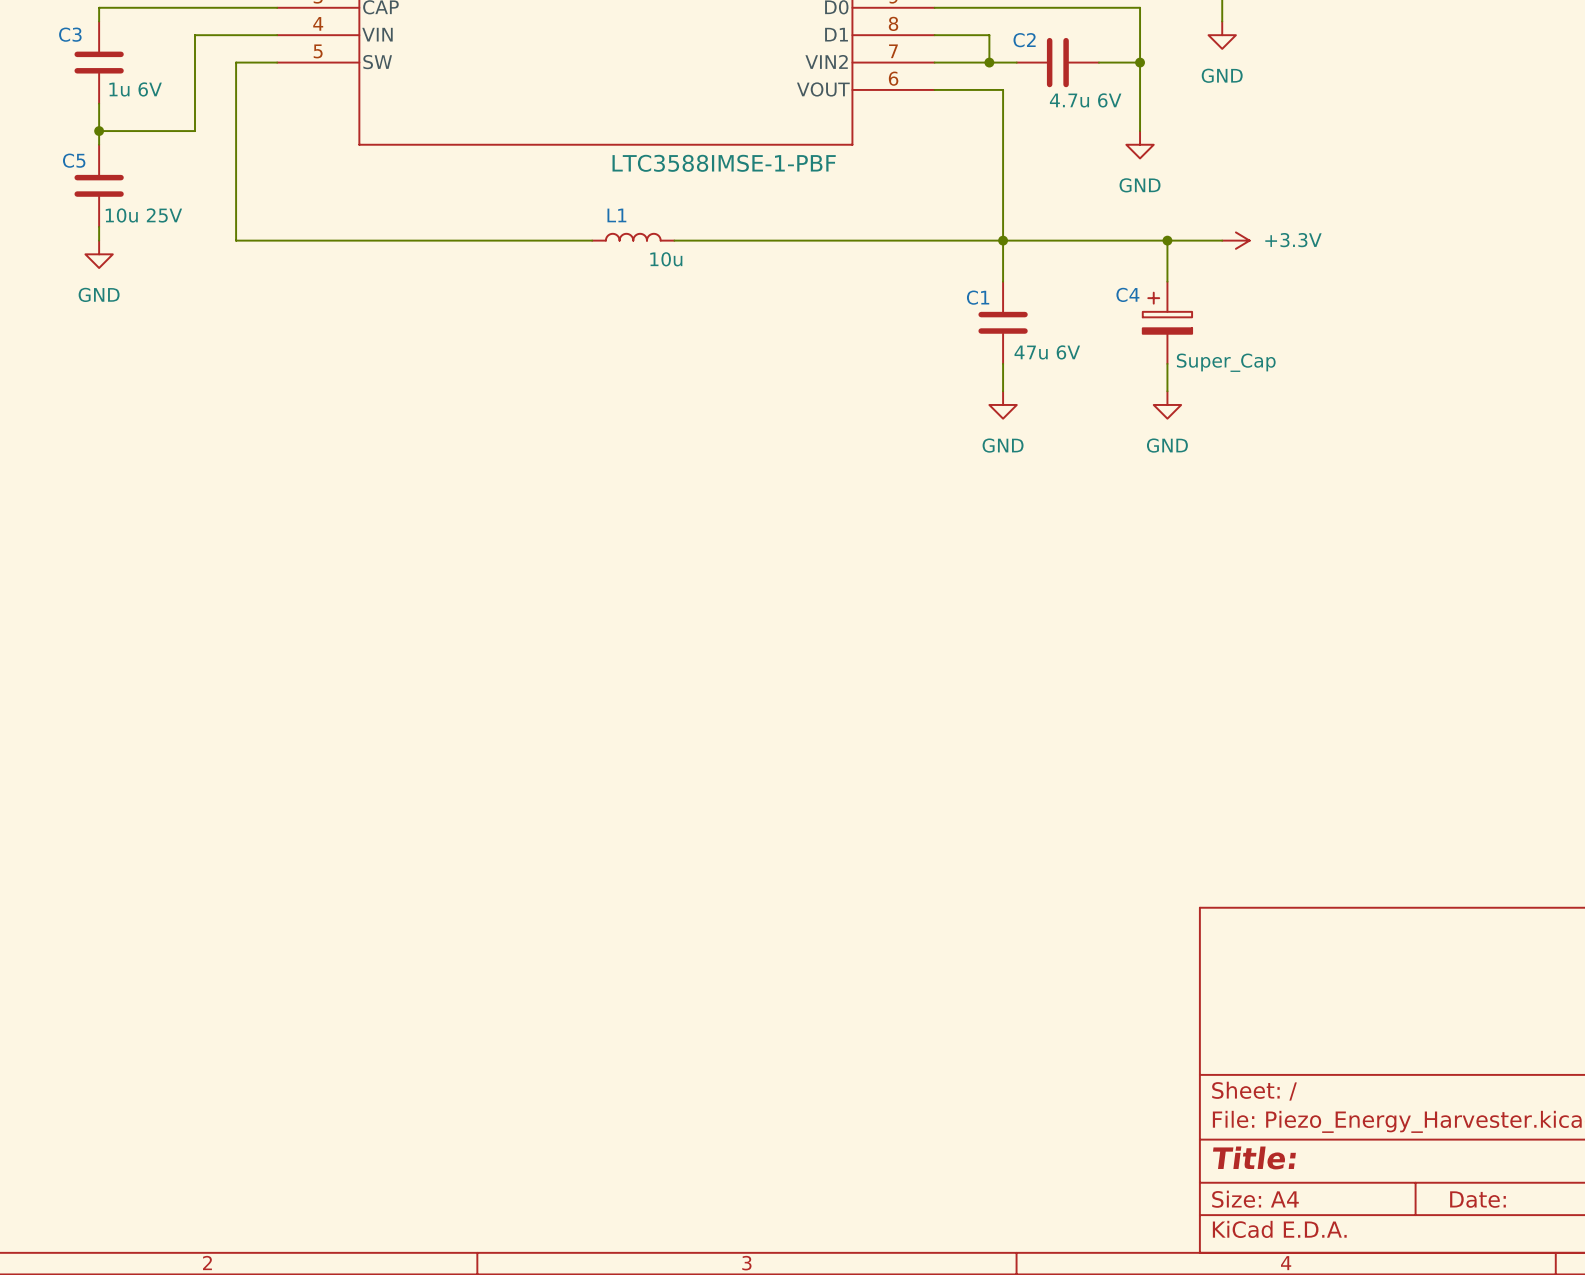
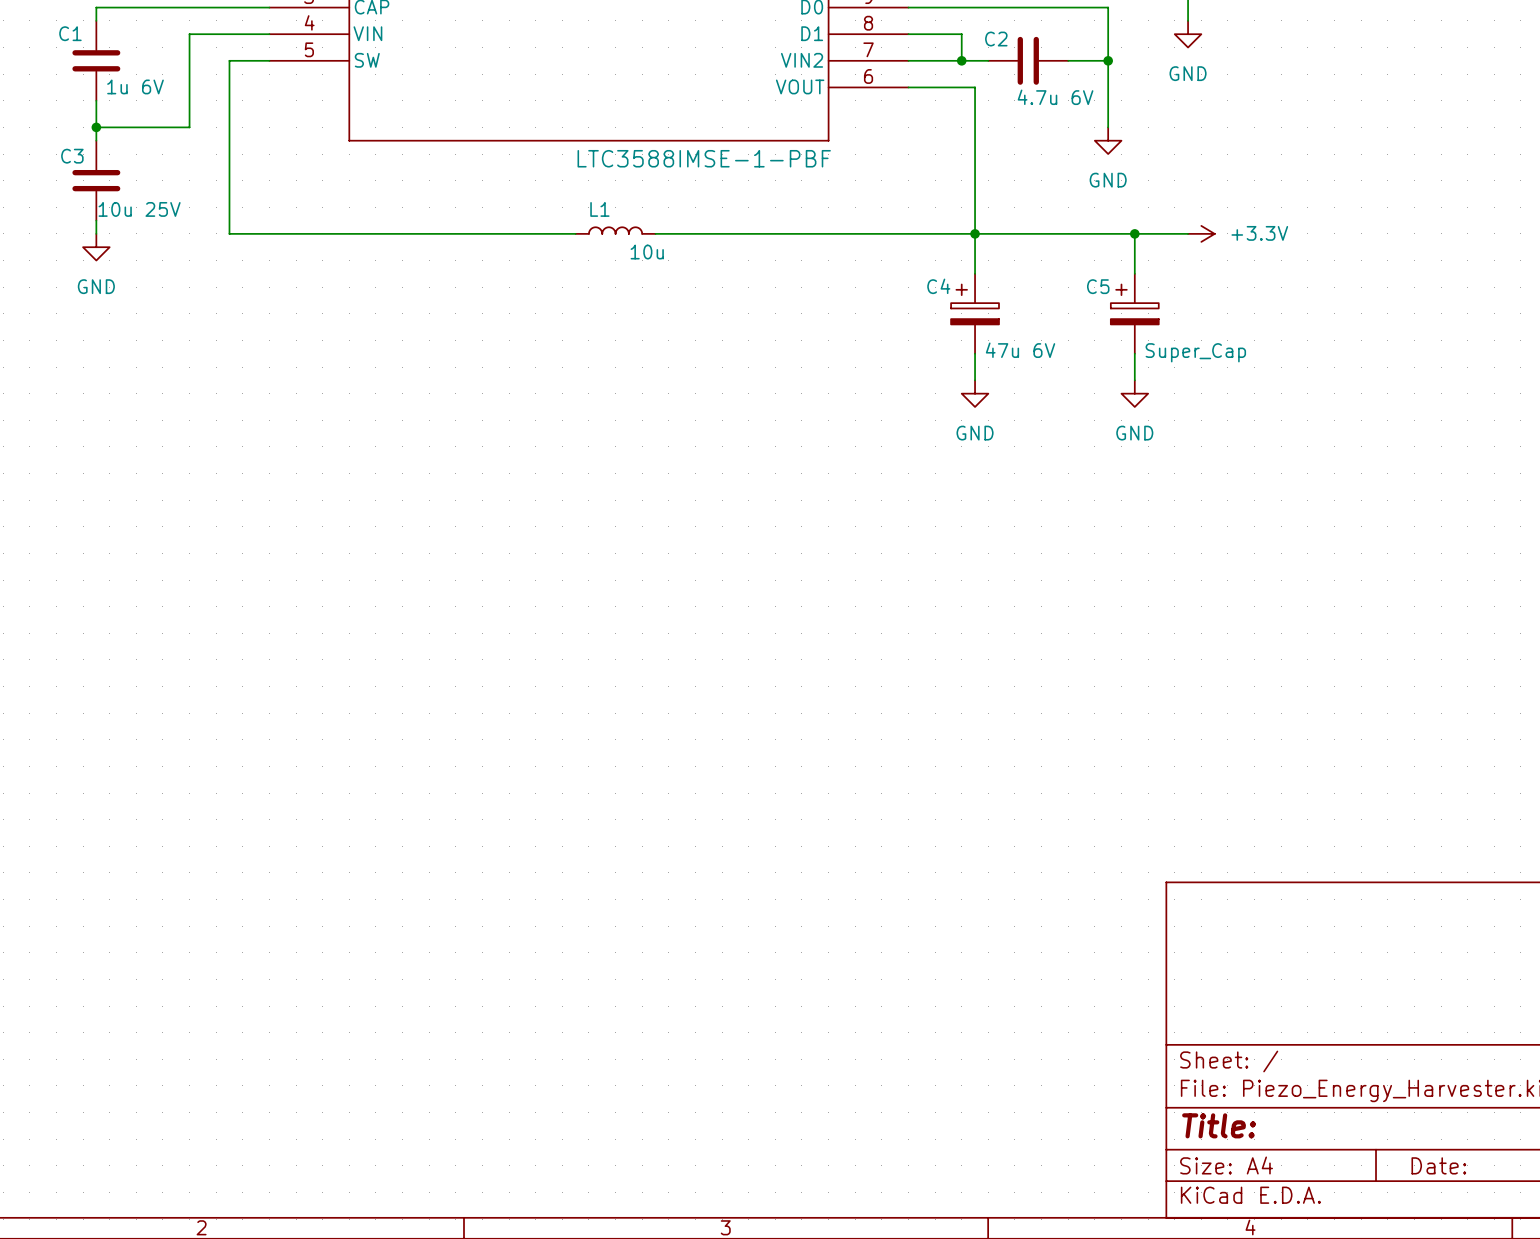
C3 name: C3 (70, 34) -> C1 (70, 33)
C5 name: C5 (74, 160) -> C3 (72, 156)
C4 name: C4 (1127, 294) -> C5 (1098, 286)
C1: 47u 6V (1003, 322) -> none
C4: none -> 47u 6V (975, 313)

